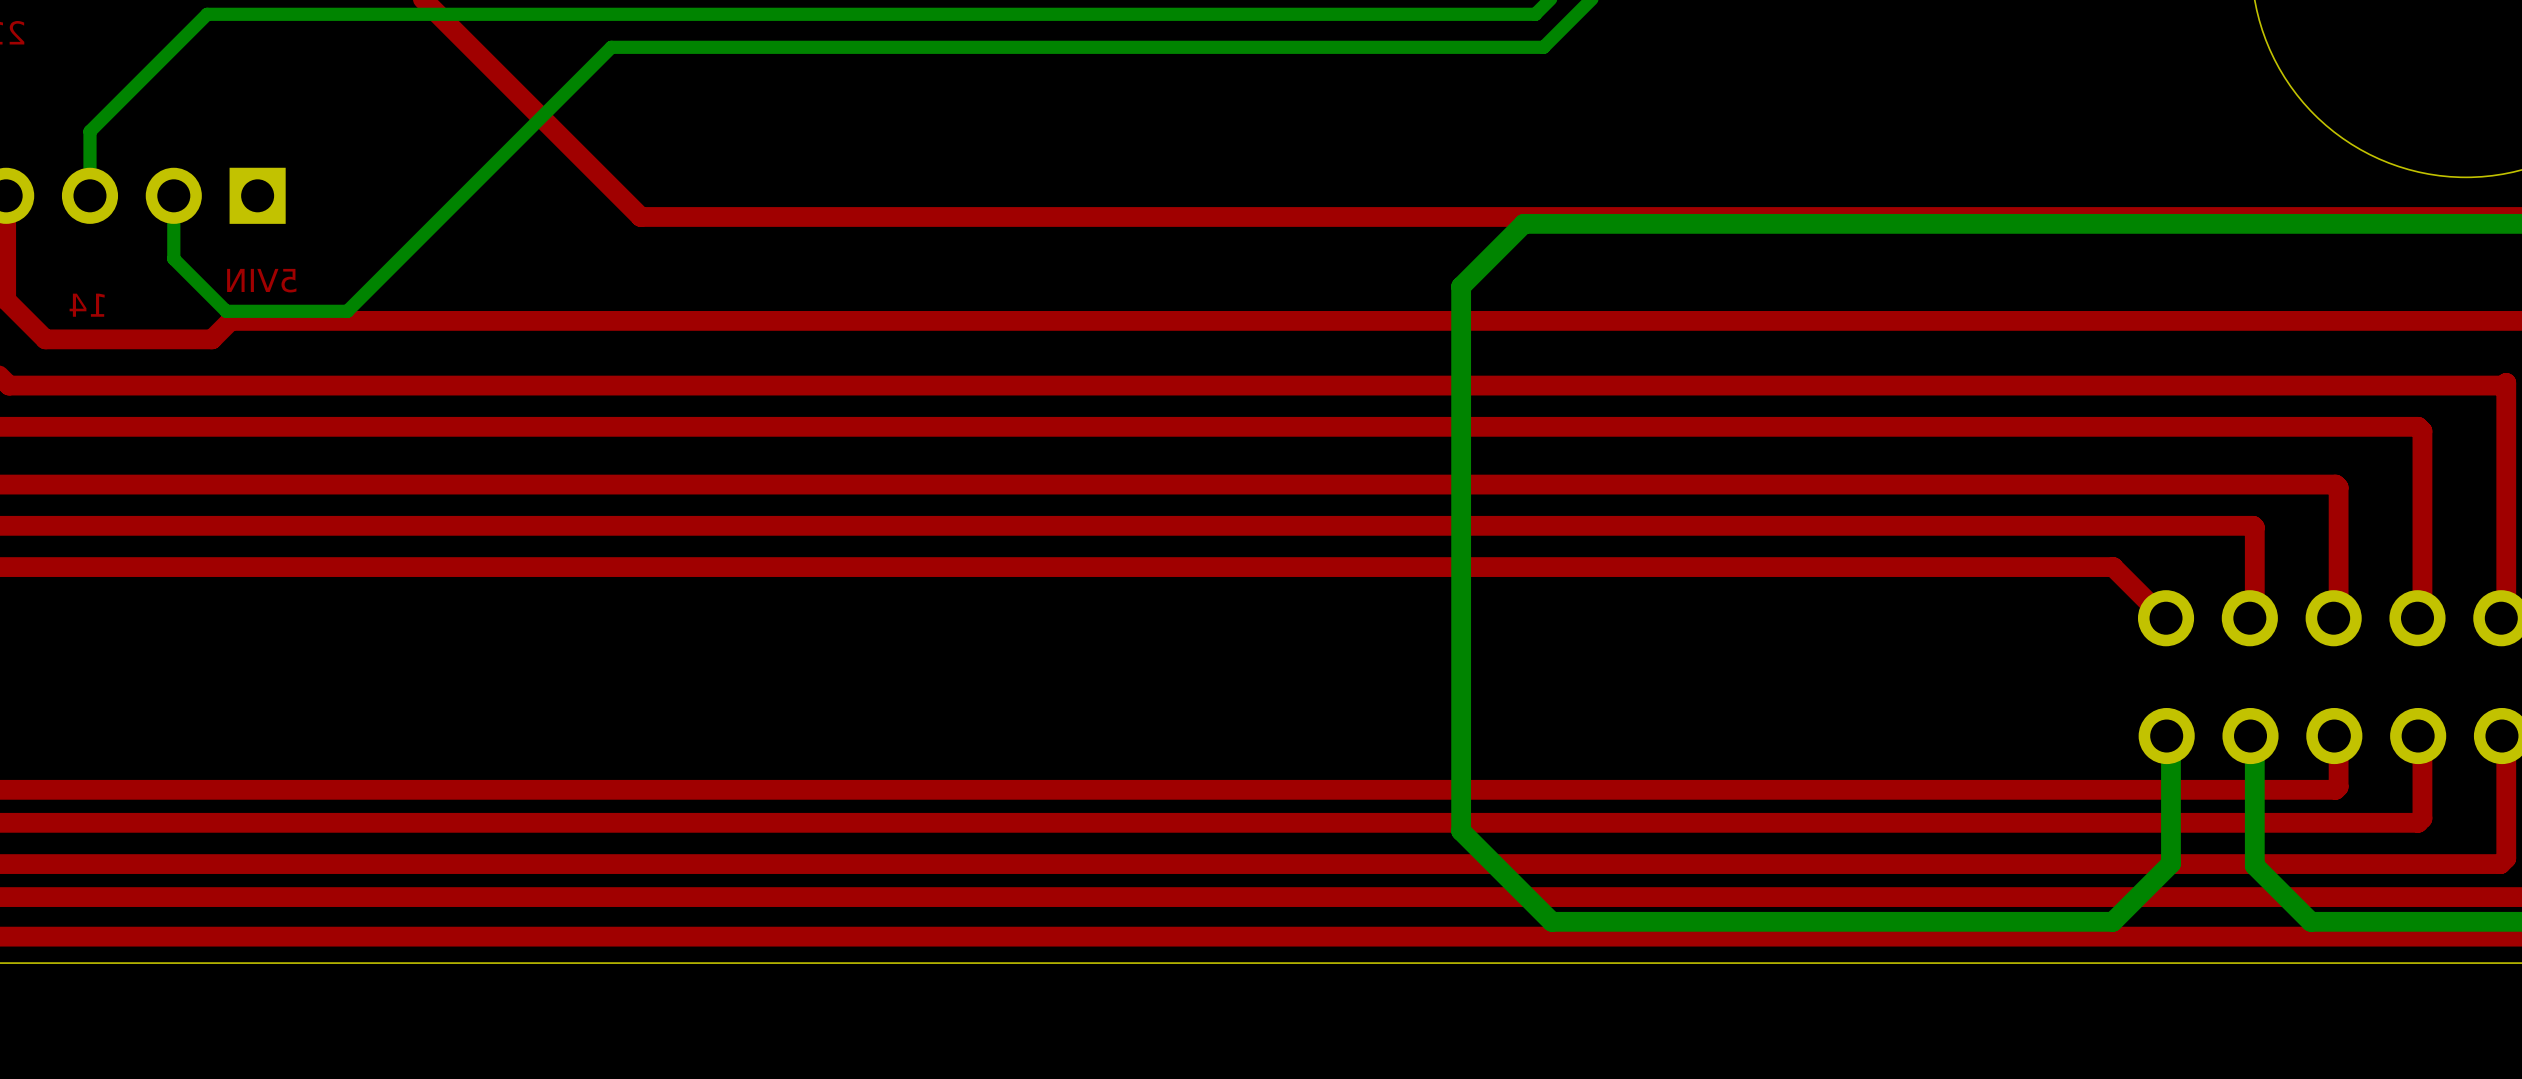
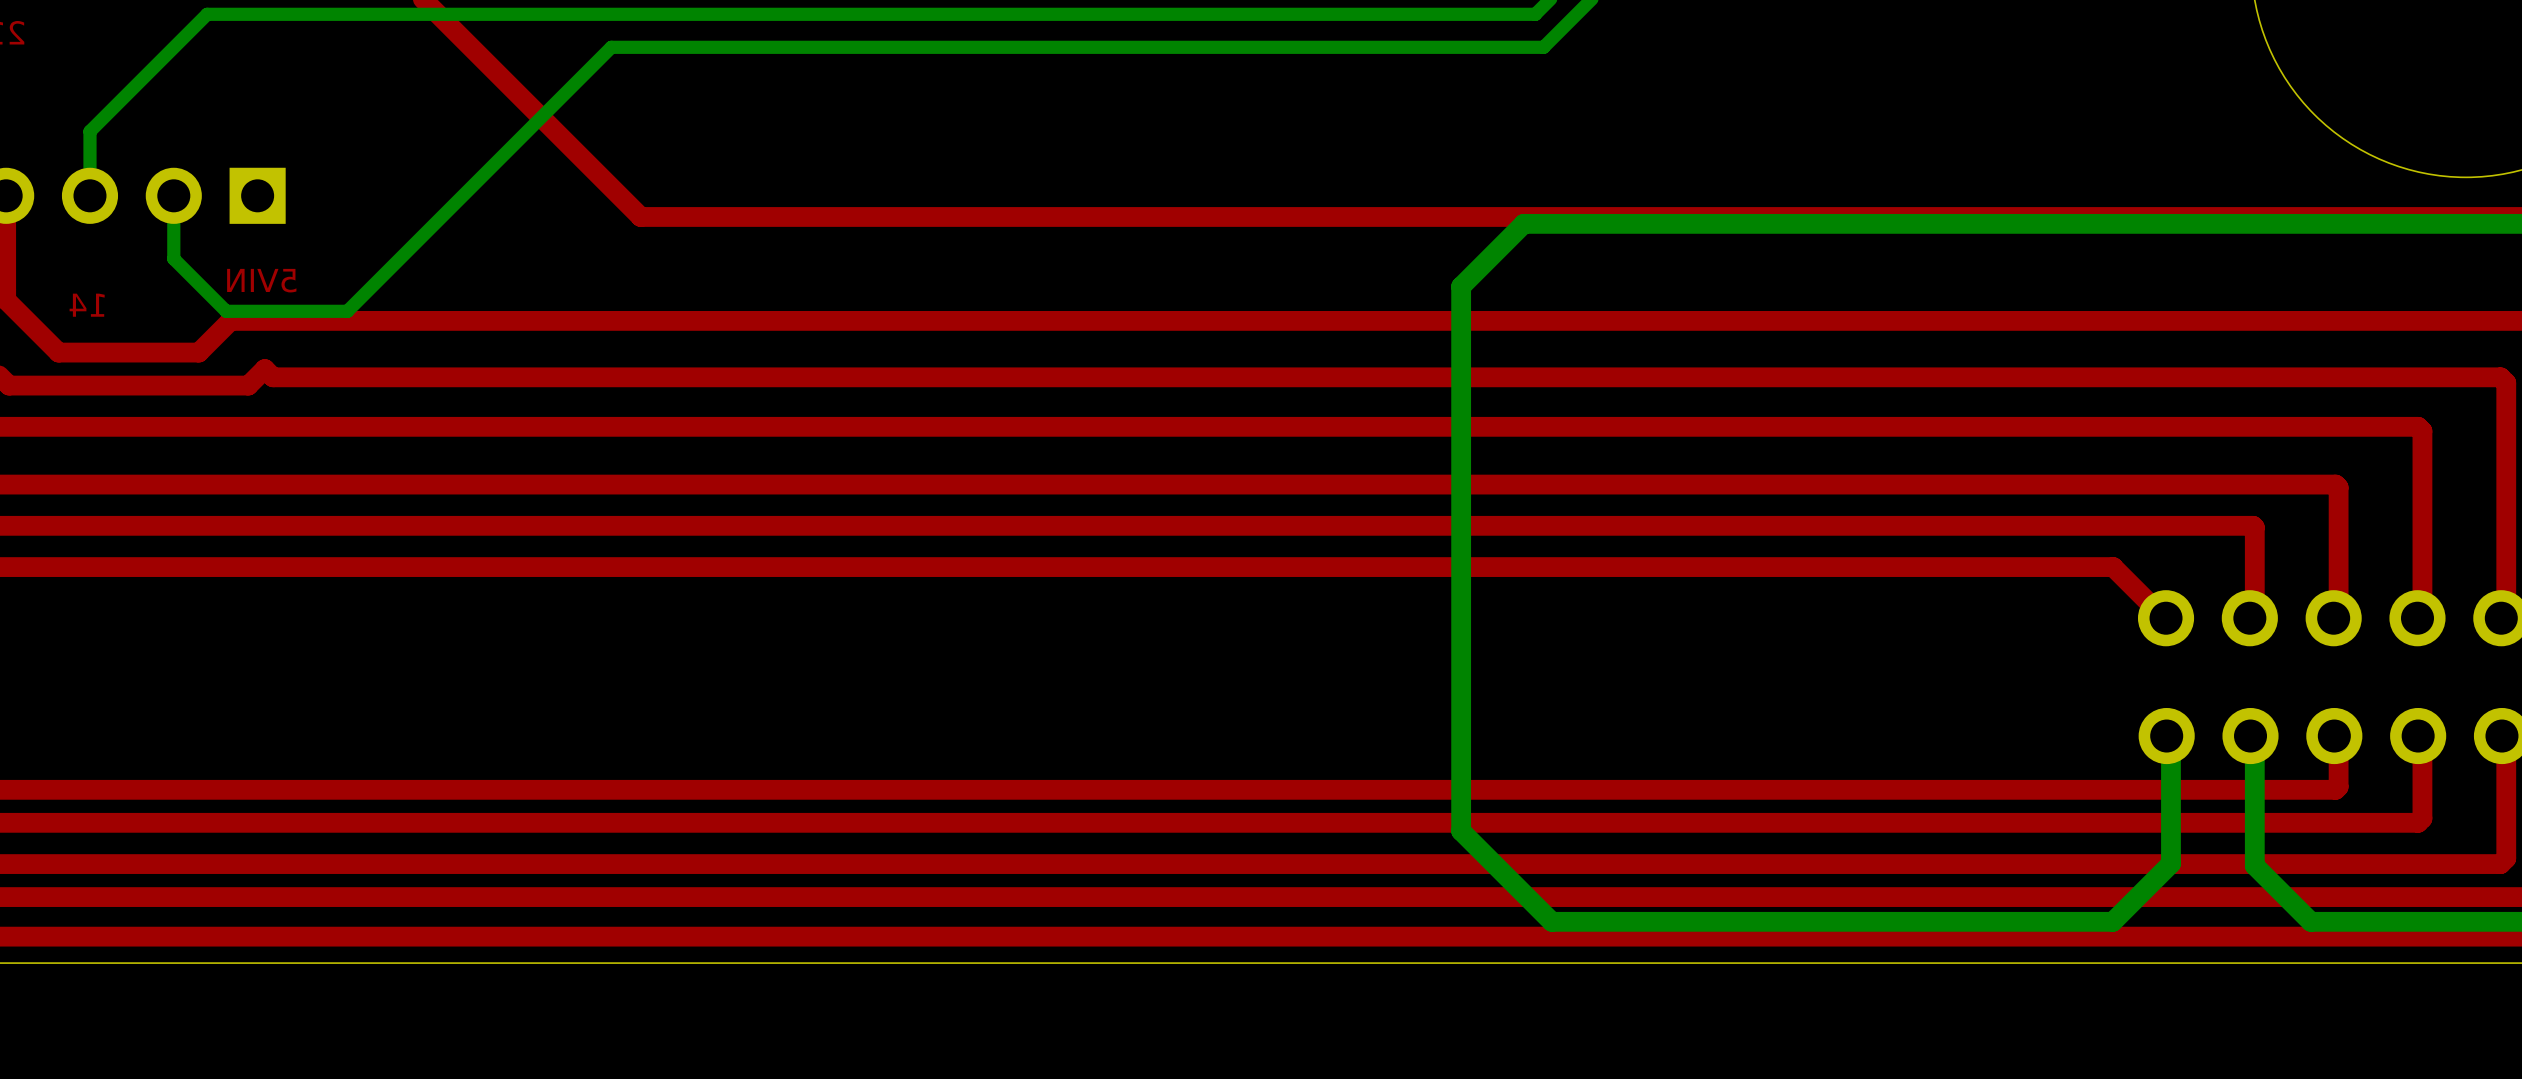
top track: (212, 339) (45, 339) -> (212, 339) (198, 352) (58, 352) (45, 339)
top track: (2506, 382) (2503, 385) (248, 385) -> (2506, 382) (2500, 377) (273, 377) (264, 369) (248, 385)

